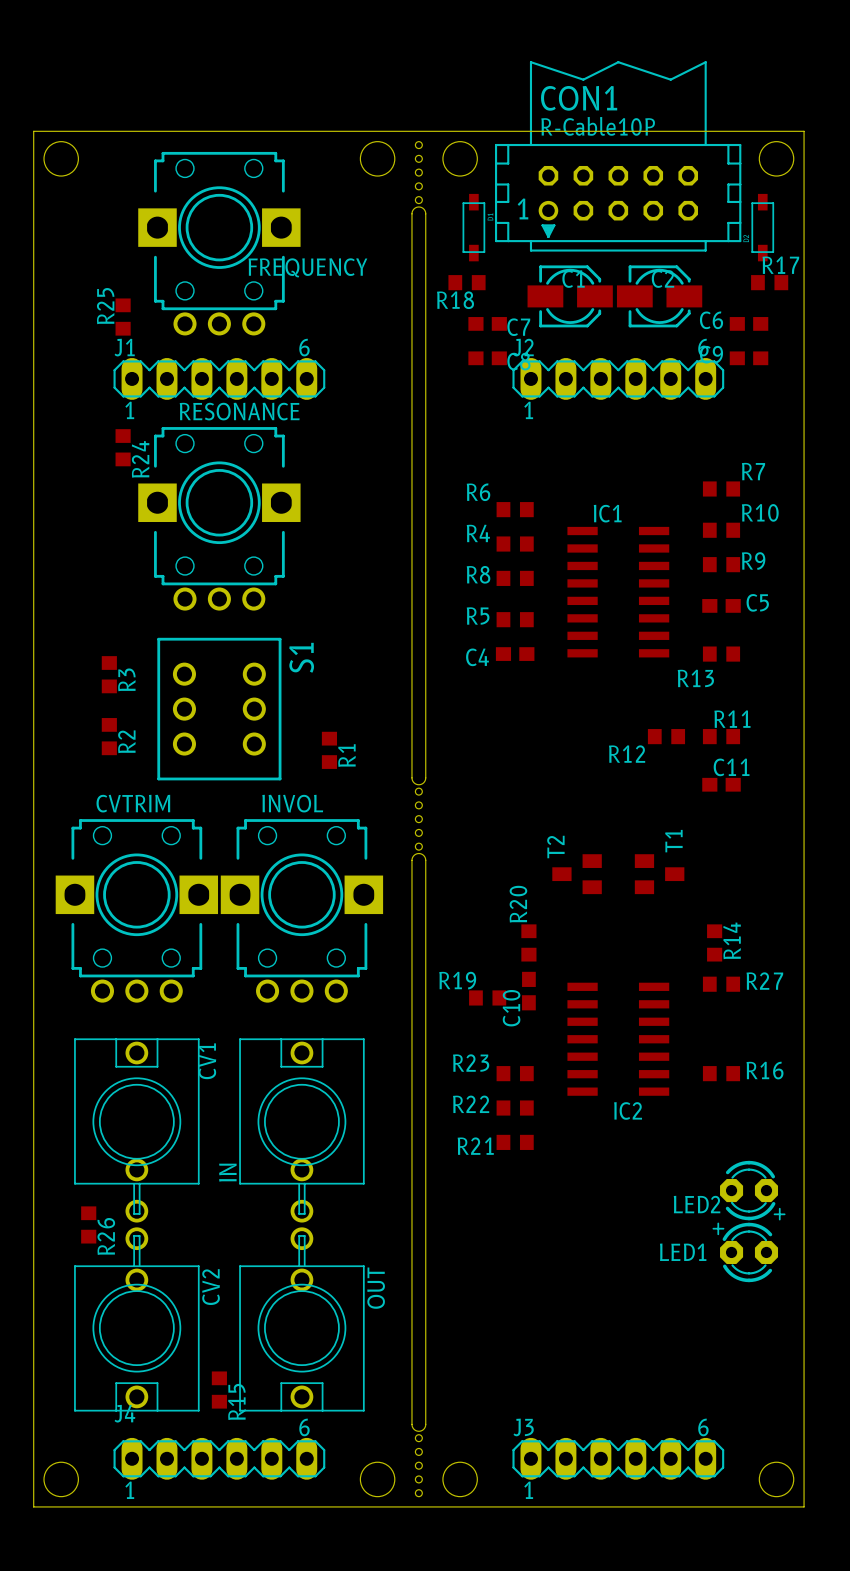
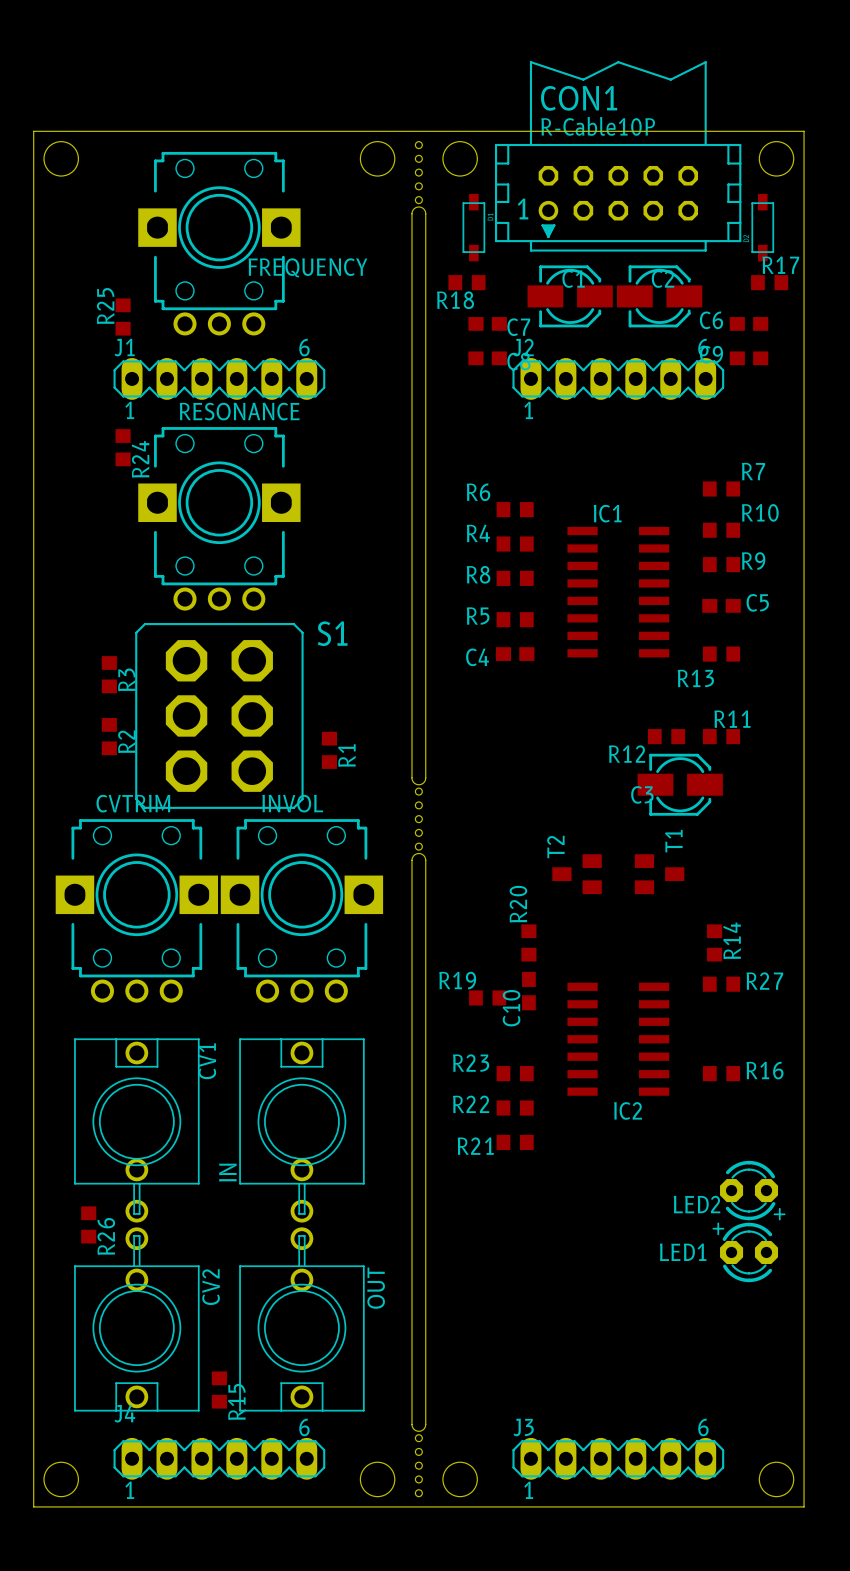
S1 footprint: [157, 637, 282, 781] -> [135, 623, 304, 809]
S1 name position: S1 (301, 657) -> S1 (332, 633)
C3: none -> (680, 784)
C11: (721, 784) -> none

